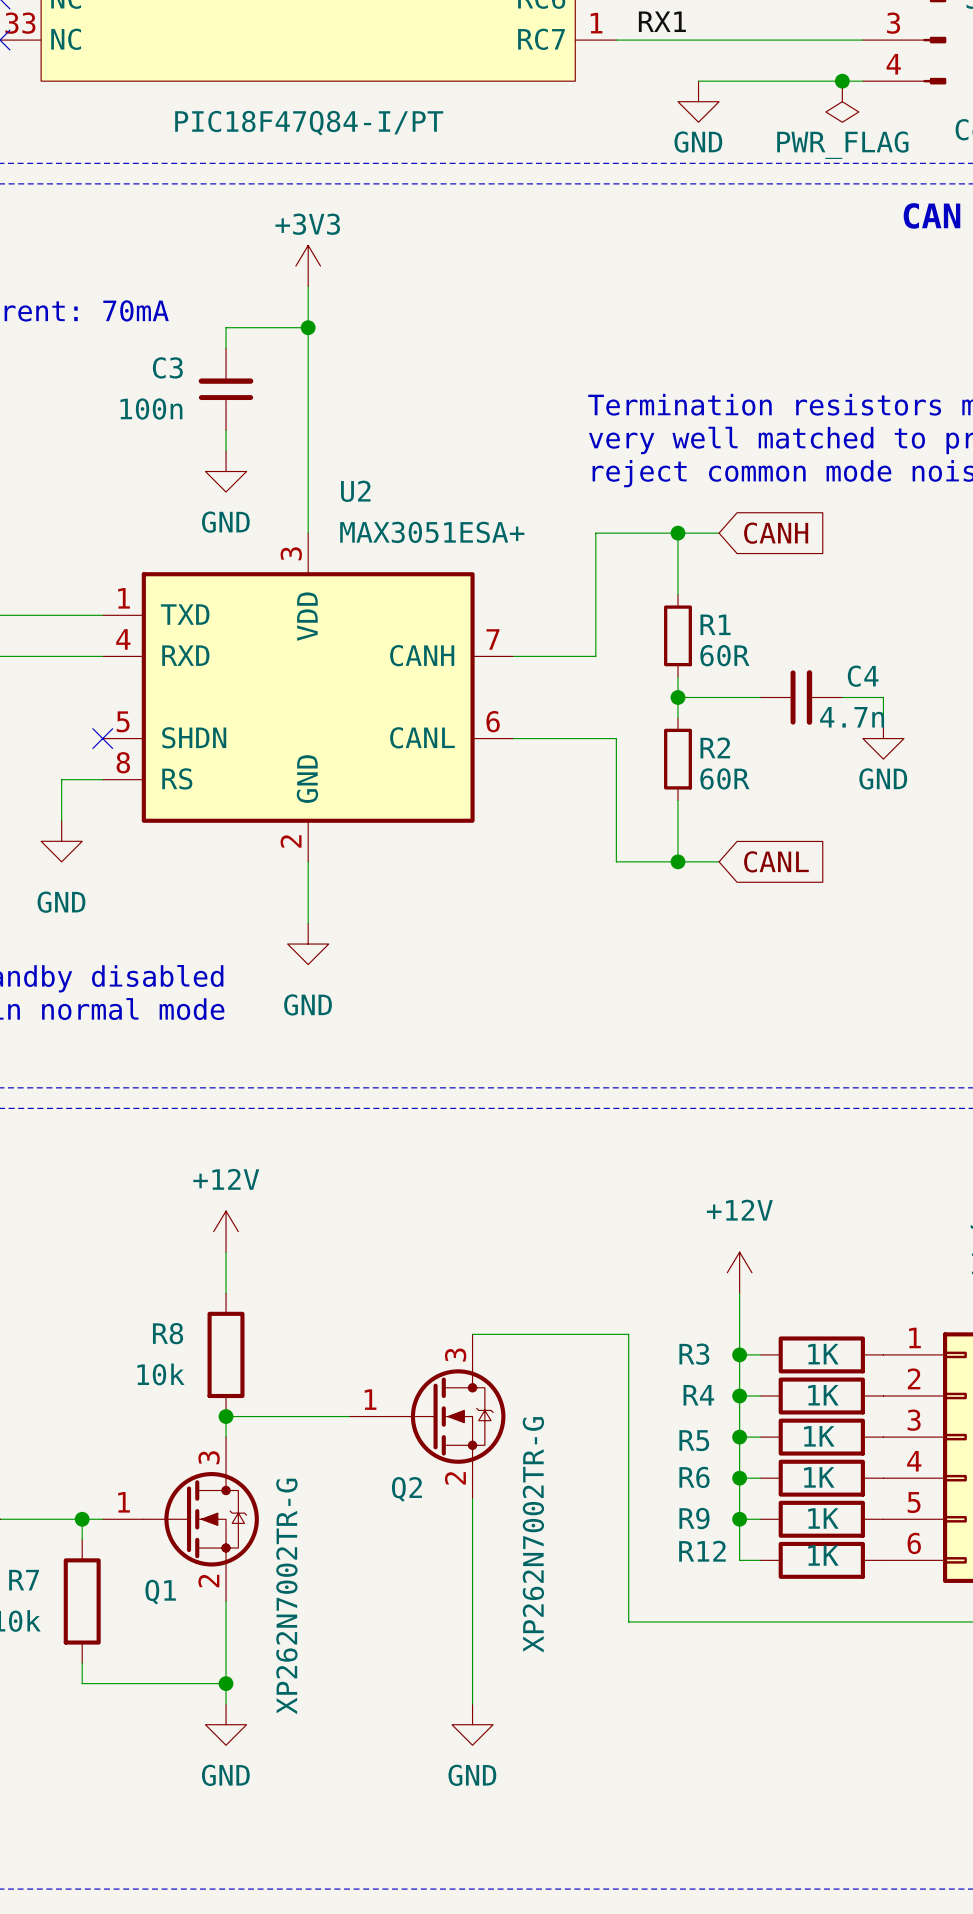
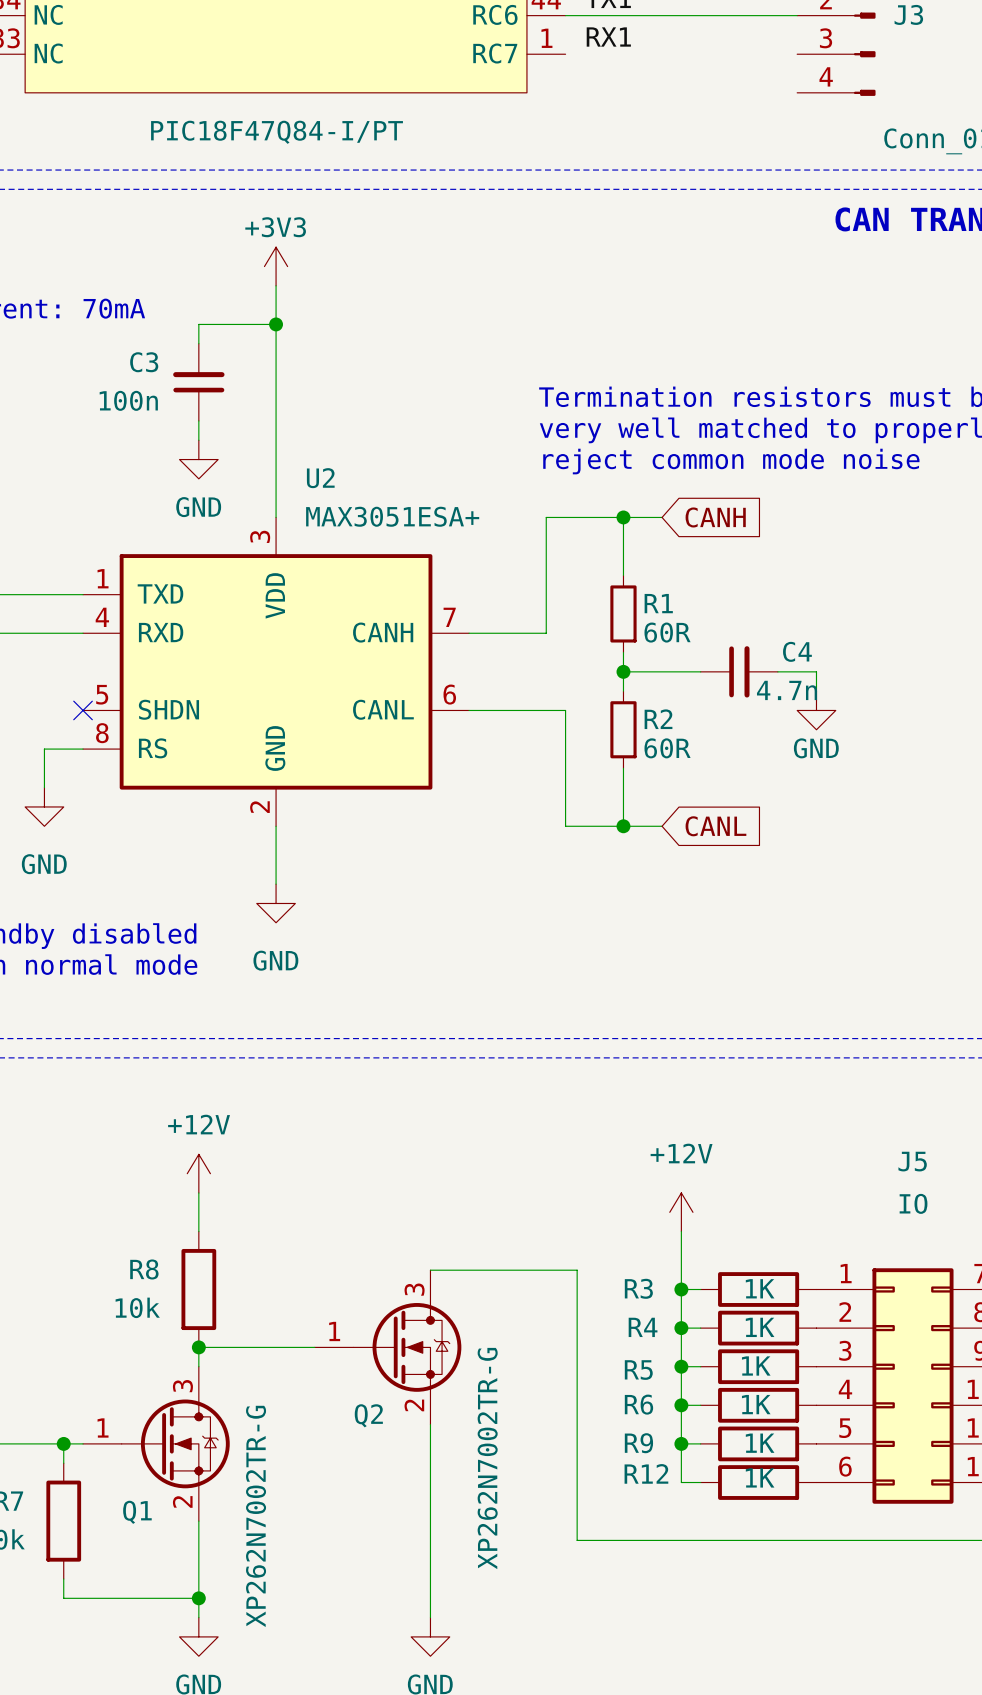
wire: (616, 40) (862, 40) -> none
wire: (698, 81) (862, 81) -> none
junction: (842, 81) -> none
power symbol: GND (698, 101) -> none
power symbol: PWR_FLAG (842, 101) -> none

